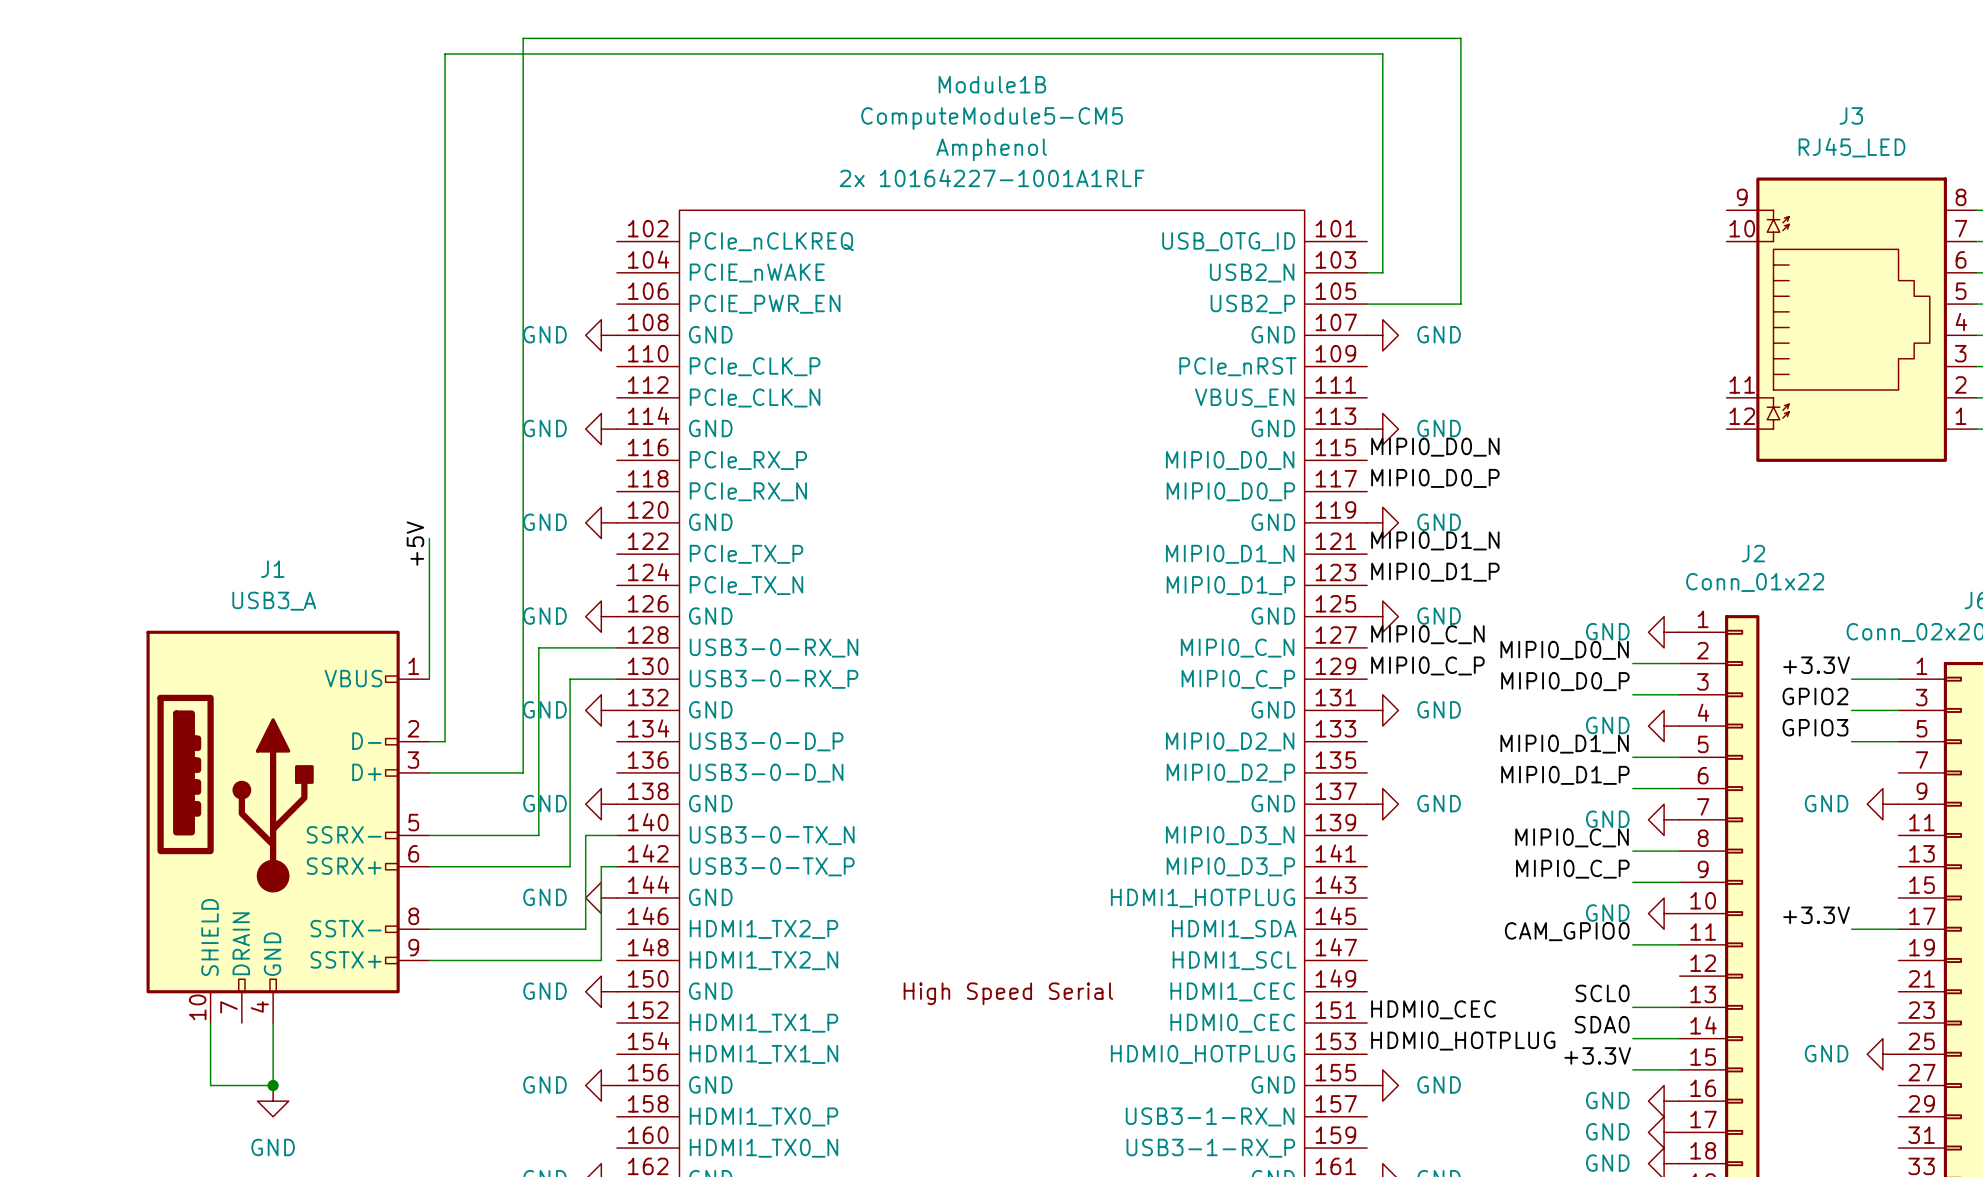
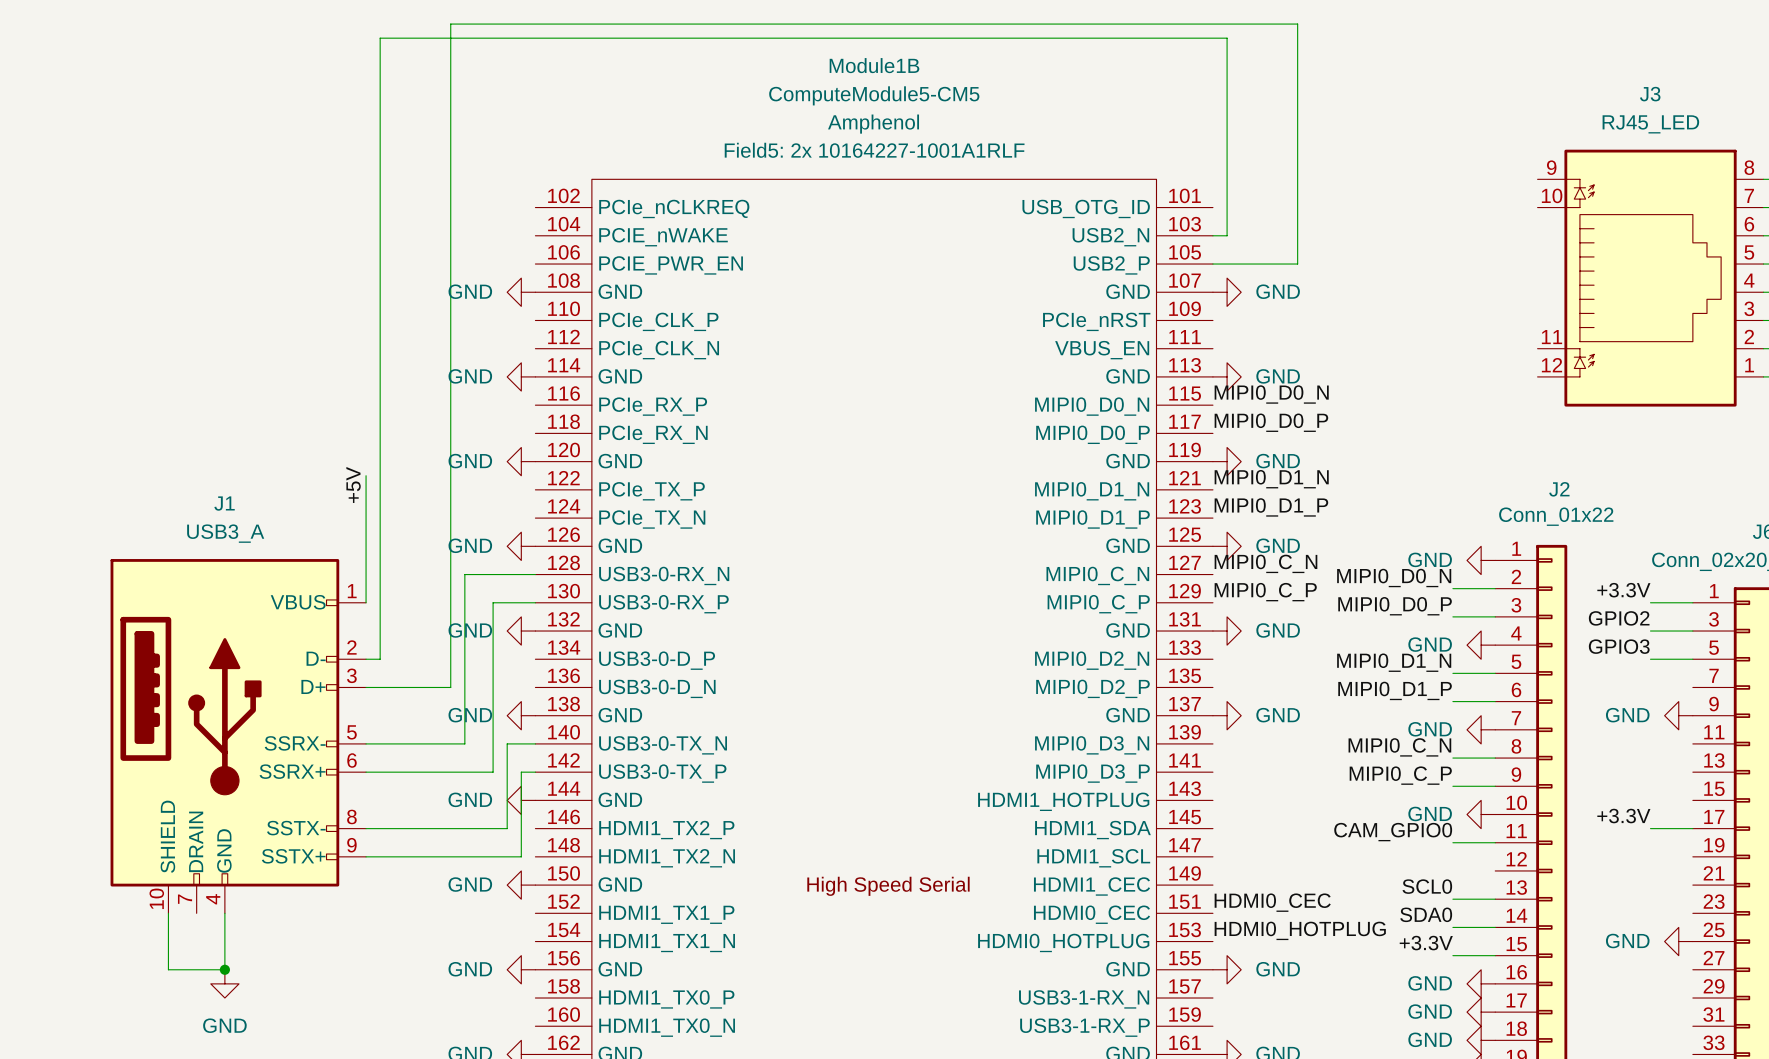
Module1B text: 2x 10164227-1001A1RLF (992, 178) -> Field5: 2x 10164227-1001A1RLF (874, 150)

